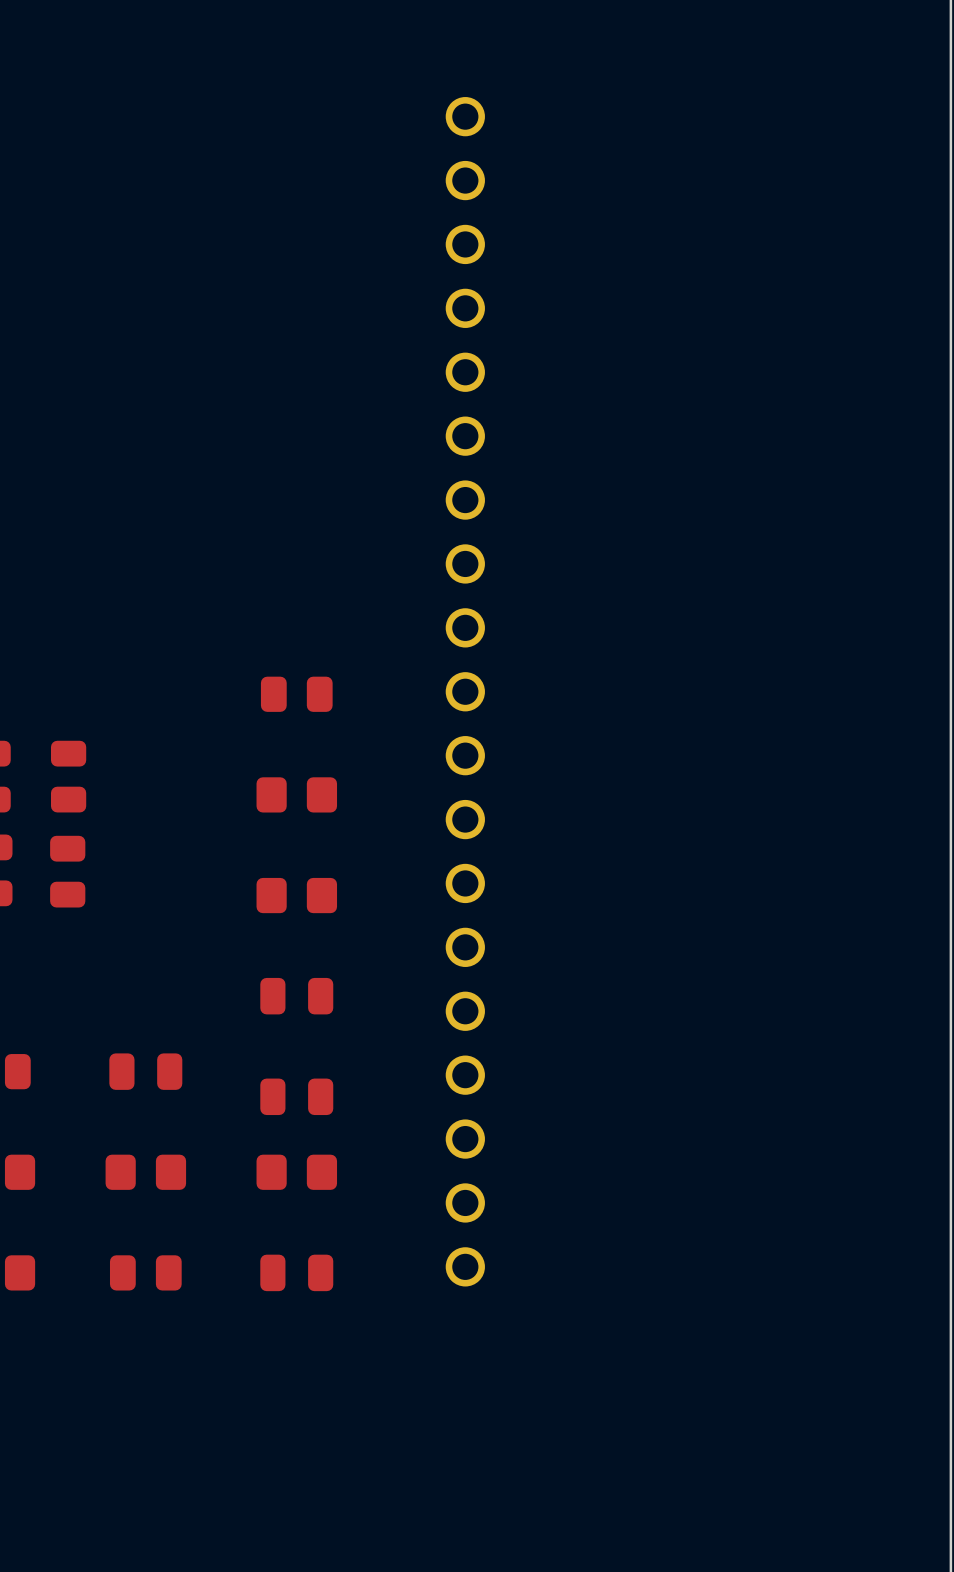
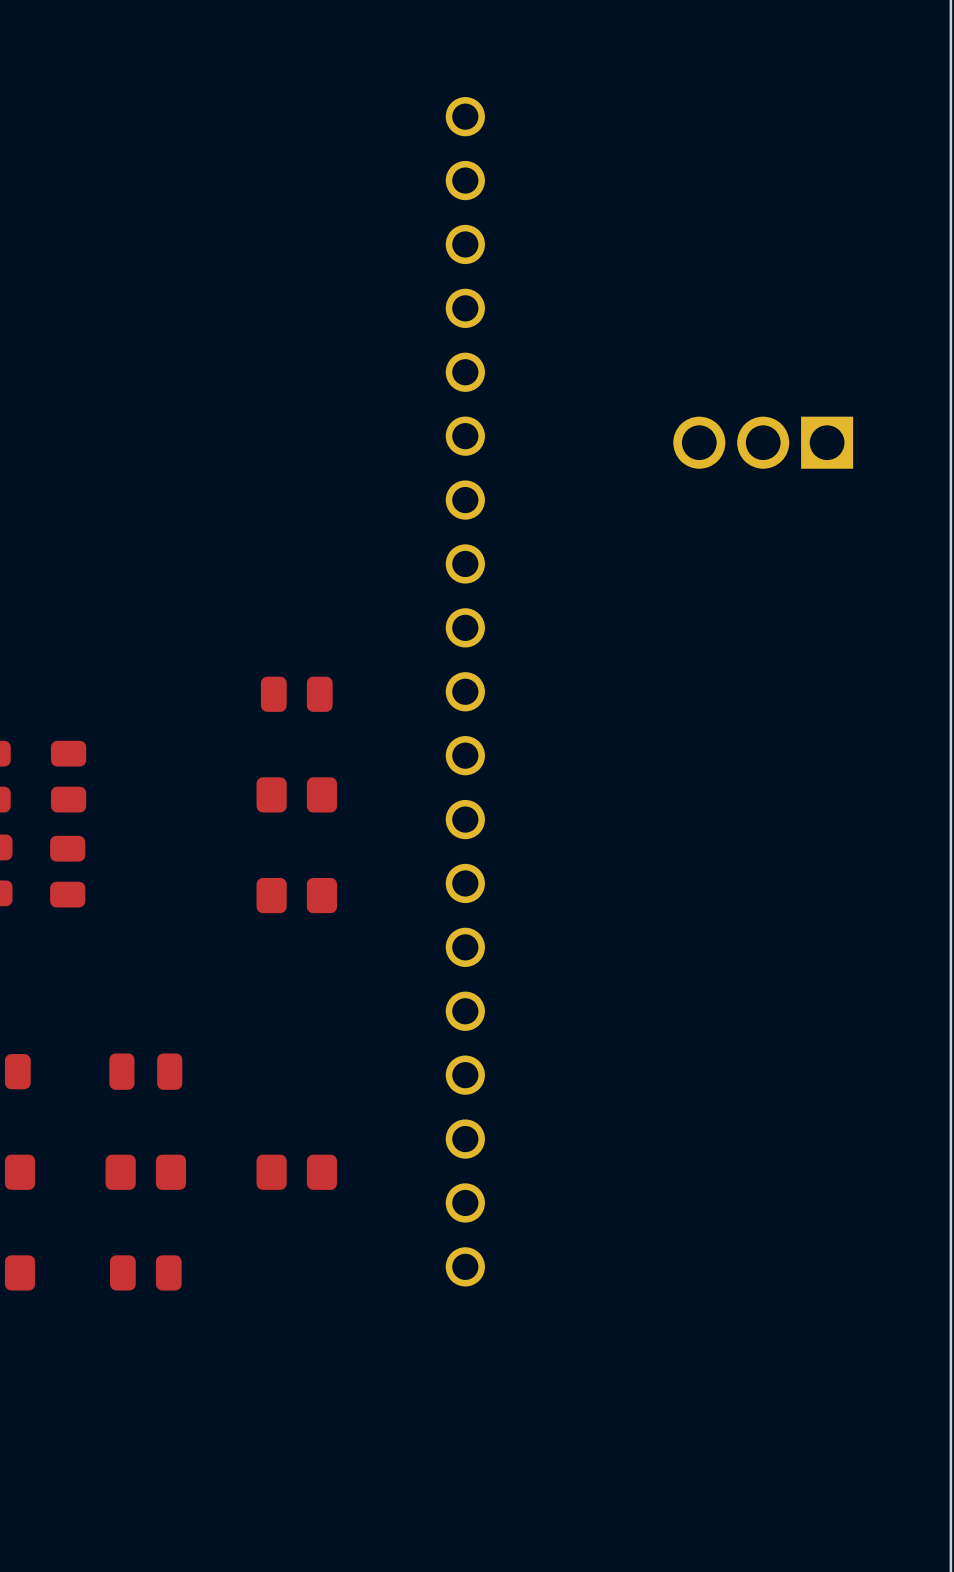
part: none -> (763, 442)
part: (296, 996) -> none
part: (296, 1096) -> none
part: (296, 1272) -> none

